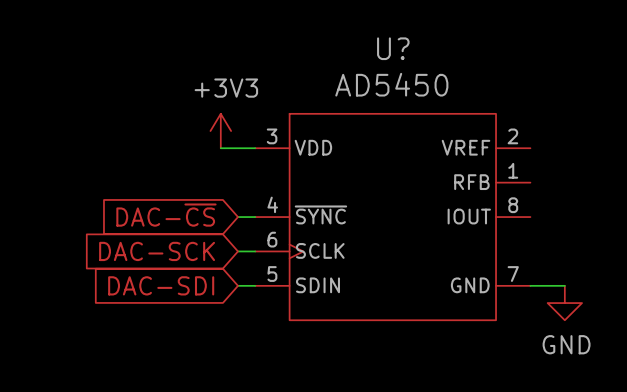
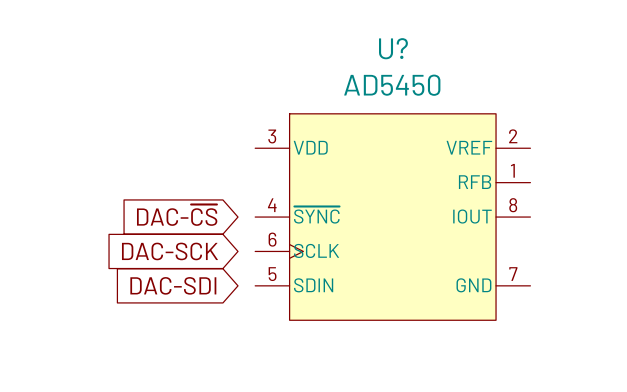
power symbol: +3V3 (220, 131) -> none
wire: (220, 148) (255, 148) -> none
wire: (238, 217) (255, 217) -> none
wire: (238, 251) (255, 251) -> none
wire: (238, 285) (255, 285) -> none
wire: (530, 285) (564, 285) -> none
power symbol: GND (564, 303) -> none

